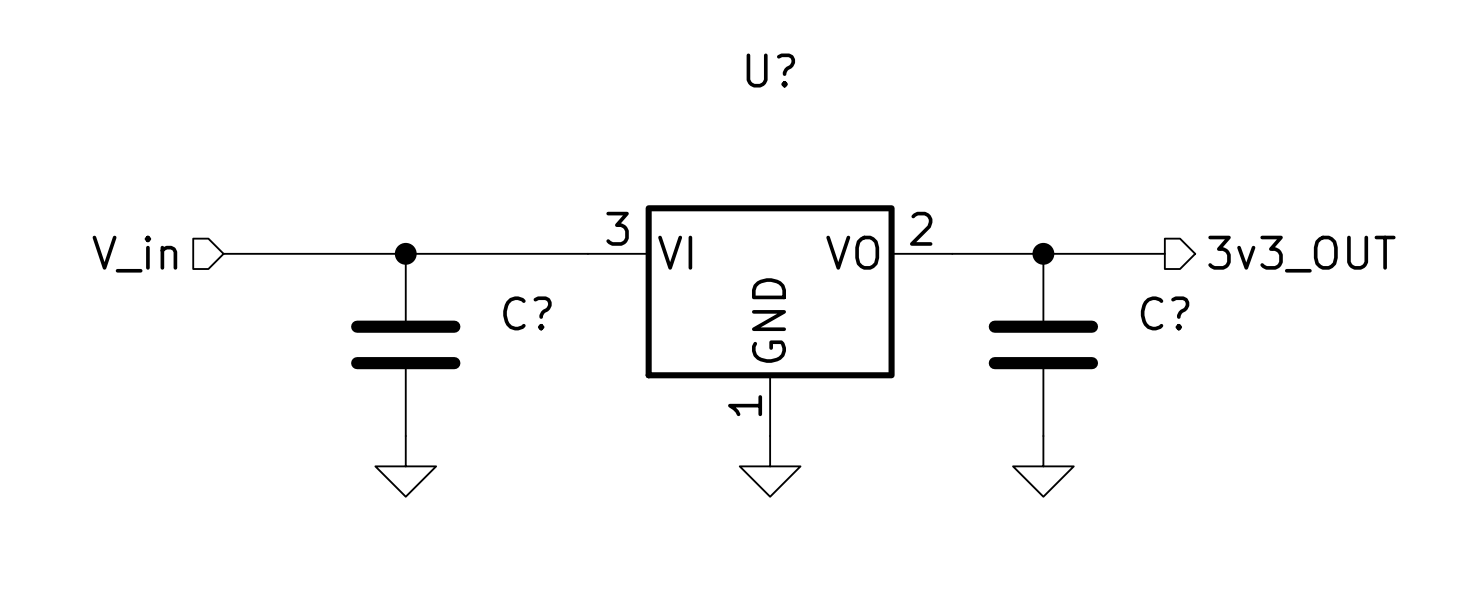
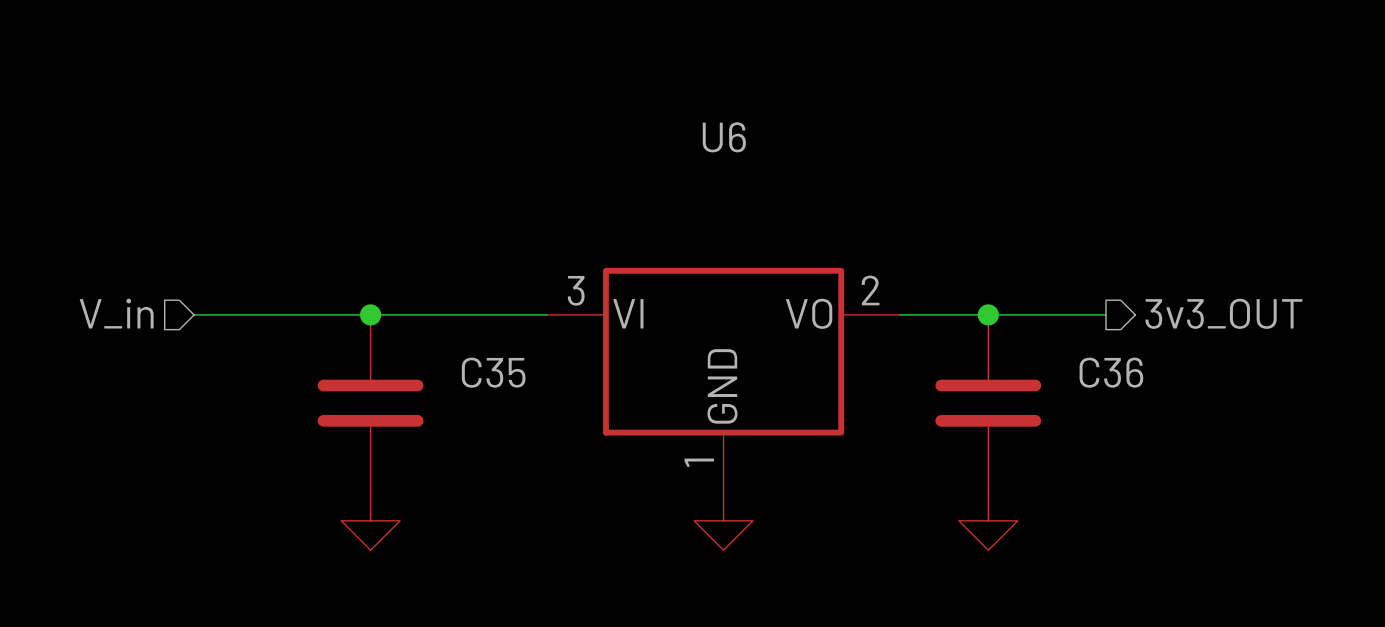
U? name: U? (770, 70) -> U6 (724, 137)
C? name: C? (527, 313) -> C35 (493, 372)
C? name: C? (1165, 313) -> C36 (1111, 372)

